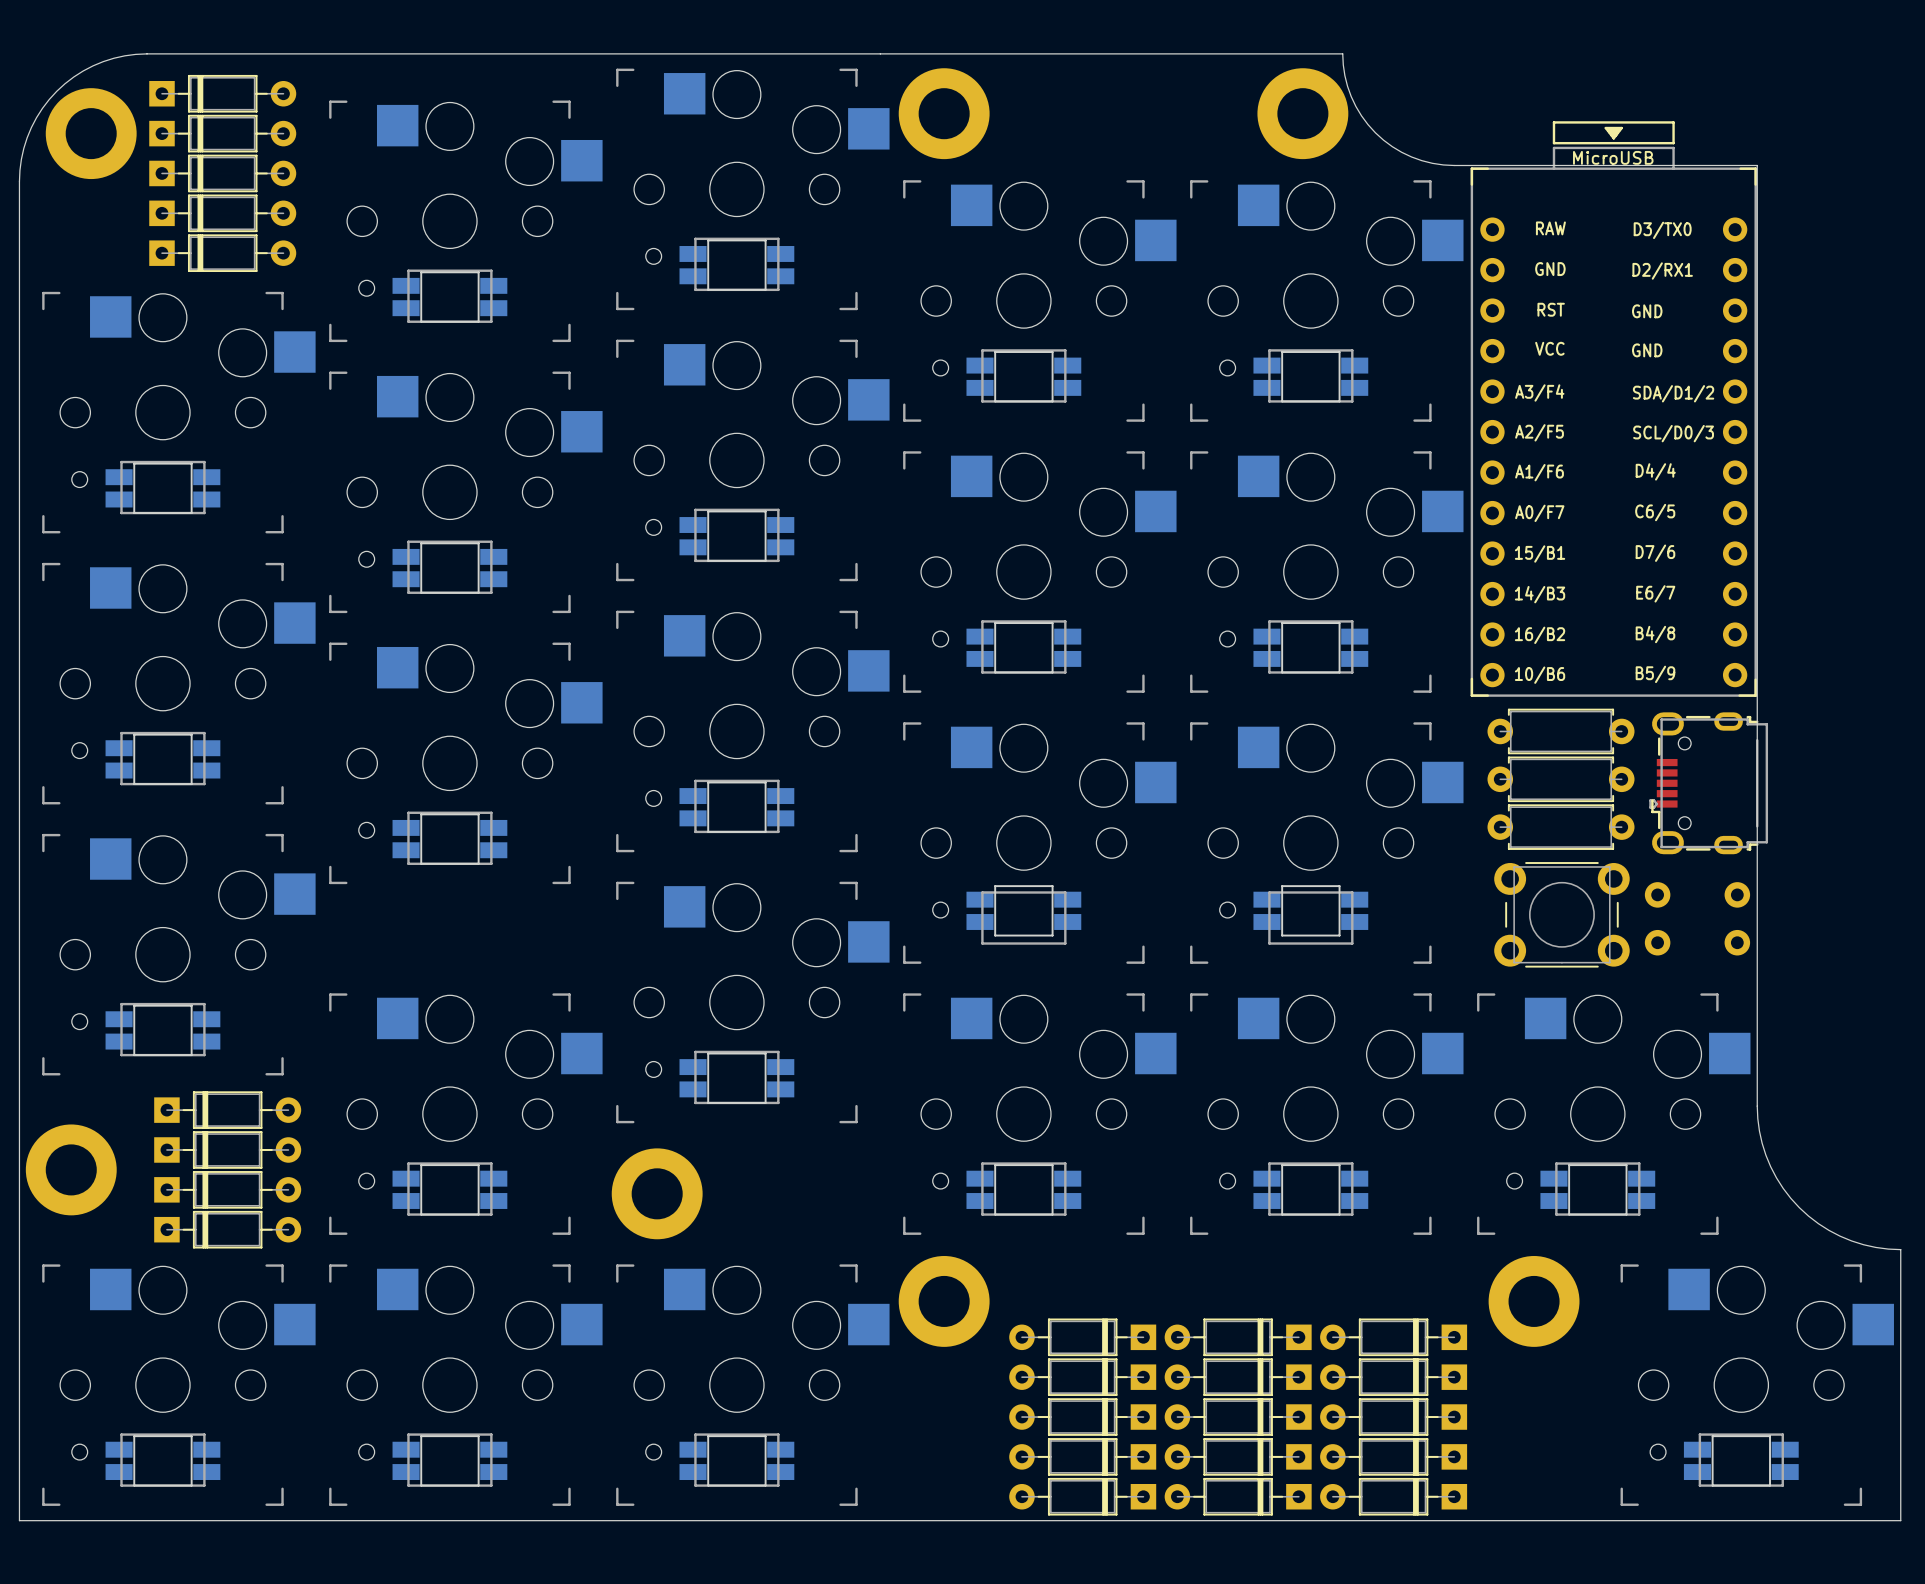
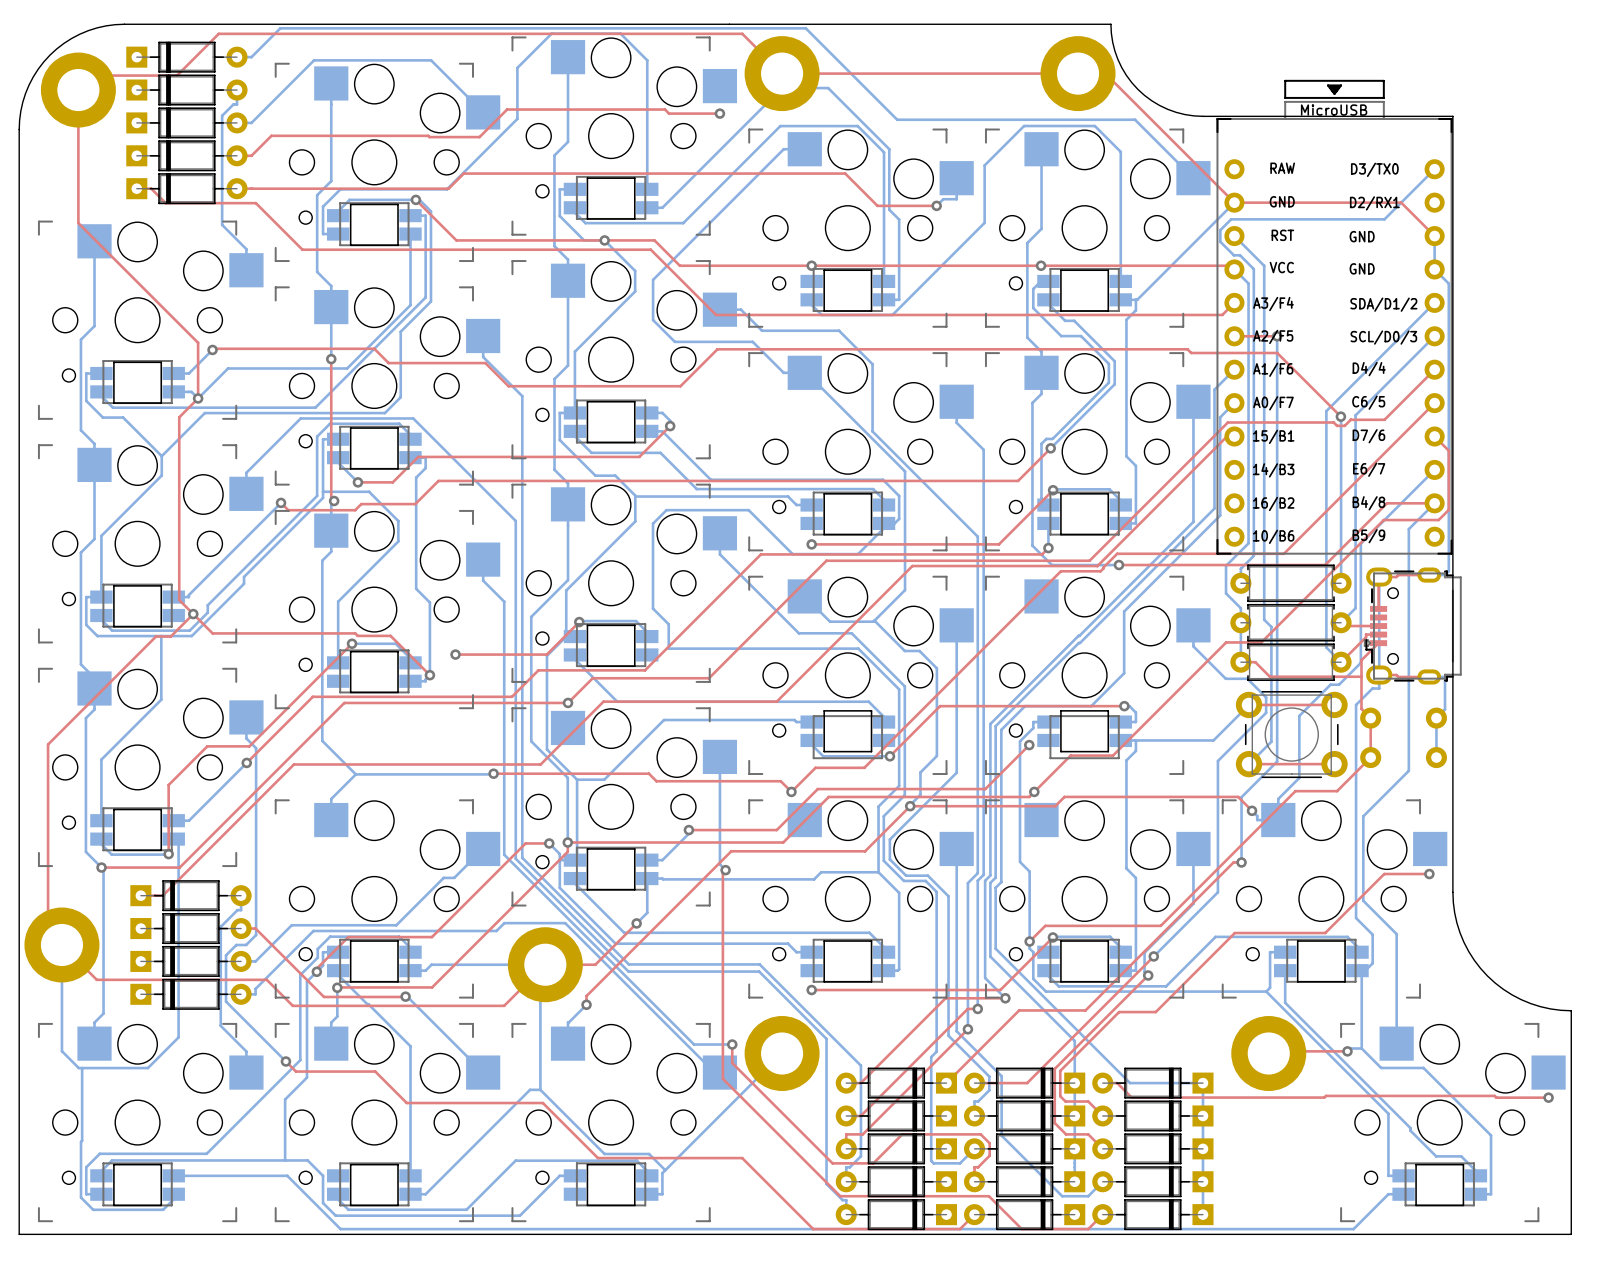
bottom track: none -> (237, 57) (251, 57) (280, 28) (805, 28) (897, 119) (1135, 119) (1193, 178)
bottom track: none -> (568, 57) (568, 141) (554, 155) (554, 246) (568, 259) (568, 365) (554, 379) (554, 469) (568, 483) (568, 580) (531, 616) (531, 741) (567, 777) (567, 842)
bottom track: none -> (331, 83) (331, 181) (317, 195) (317, 271) (331, 286) (331, 359)
bottom track: none -> (782, 88) (828, 88) (889, 149) (889, 209) (899, 219) (899, 299) (884, 299)
bottom track: none -> (782, 88) (662, 207) (647, 207)
bottom track: none -> (237, 90) (237, 104) (233, 104) (222, 115) (222, 224) (246, 249) (246, 270)
bottom track: none -> (483, 112) (431, 60) (314, 60) (251, 122) (237, 122)
top track: none -> (719, 113) (669, 113) (664, 109) (507, 109) (479, 137) (271, 135) (251, 155) (237, 155)
via: none -> (719, 113)
bottom track: none -> (804, 149) (783, 149) (653, 279) (653, 320) (674, 341) (752, 341) (783, 372) (806, 372) (905, 471) (905, 590) (873, 621) (830, 621) (804, 596)
bottom track: none -> (1041, 149) (1041, 228) (1027, 243) (1027, 337) (1041, 351) (1041, 393) (1032, 402) (1032, 545) (1051, 565) (1118, 565)
bottom track: none -> (1434, 169) (1384, 219) (1231, 219) (1220, 230) (1220, 241) (1233, 255) (1240, 255) (1253, 269) (1253, 555) (1240, 568) (1240, 583)
bottom track: none -> (956, 178) (956, 199) (943, 199) (936, 205)
top track: none -> (136, 188) (151, 188) (165, 203) (255, 203) (302, 249) (650, 249) (716, 314) (1222, 314) (1234, 302)
top track: none -> (237, 188) (448, 188) (463, 173) (845, 173) (877, 205) (936, 205)
bottom track: none -> (574, 189) (559, 189) (559, 216) (584, 240) (604, 240) (635, 270) (635, 291) (574, 351) (574, 412) (559, 412) (559, 440) (595, 475) (615, 475) (635, 495) (635, 521) (566, 590) (566, 636)
bottom track: none -> (647, 189) (647, 60) (620, 33) (551, 33) (517, 67) (517, 118) (446, 189) (340, 189) (323, 206) (323, 234) (338, 234)
top track: none -> (415, 199) (456, 240) (654, 240) (679, 265) (1230, 265) (1234, 269)
via: none -> (415, 199)
bottom track: none -> (1234, 202) (1137, 299) (1120, 299)
via: none -> (936, 205)
bottom track: none -> (574, 207) (574, 212) (585, 223) (683, 223) (780, 126) (857, 126) (884, 152) (884, 281)
bottom track: none -> (338, 215) (338, 211) (349, 199) (419, 199) (430, 211) (430, 301) (400, 331) (400, 397) (384, 413) (204, 413) (161, 456)
bottom track: none -> (410, 215) (425, 215) (425, 297) (315, 407) (112, 407) (101, 396) (101, 391)
bottom track: none -> (410, 234) (410, 305) (347, 368) (228, 368) (198, 398) (191, 391) (173, 391)
bottom track: none -> (1234, 236) (1264, 265) (1264, 619) (1271, 626) (1271, 741) (1249, 764)
top track: none -> (1434, 236) (1401, 202) (1234, 202) (1105, 73) (782, 73) (742, 33) (218, 33) (177, 75) (92, 75) (78, 90) (78, 223) (198, 342) (198, 398) (179, 417) (179, 600) (212, 633) (355, 633) (357, 635) (390, 635) (429, 675)
bottom track: none -> (1434, 236) (1434, 269) (1448, 283) (1448, 571) (1445, 575) (1429, 575)
via: none -> (604, 240)
bottom track: none -> (94, 241) (94, 326) (80, 339) (80, 430) (94, 443) (94, 539) (80, 552) (80, 664) (94, 677) (94, 709) (85, 718) (85, 851) (103, 869) (103, 1013) (94, 1022) (94, 1043)
via: none -> (811, 265)
via: none -> (1041, 265)
bottom track: none -> (1234, 269) (1248, 283) (1248, 543) (1226, 565) (1226, 593) (1240, 608) (1240, 662)
bottom track: none -> (1048, 281) (1040, 281) (1033, 288) (1033, 308) (1061, 336) (1081, 336) (1108, 363) (1108, 382) (1052, 438) (1046, 438) (1041, 443) (1041, 498) (1048, 505)
bottom track: none -> (1120, 281) (1120, 151) (1094, 126) (1024, 126) (984, 165) (984, 222) (892, 315) (821, 315) (811, 304) (811, 299)
bottom track: none -> (1048, 299) (1048, 304) (1065, 320) (1074, 320) (1114, 361) (1114, 384) (1050, 448)
bottom track: none -> (1135, 299) (1135, 310) (1126, 319) (1126, 456) (1135, 465) (1135, 523) (1120, 523)
bottom track: none -> (1434, 302) (1326, 411) (1326, 647) (1341, 662)
bottom track: none -> (719, 309) (740, 309) (762, 330) (839, 330) (872, 364) (872, 431) (977, 536) (977, 873) (967, 883) (967, 1029)
bottom track: none -> (483, 336) (483, 357) (522, 396) (522, 857) (628, 964) (759, 964) (860, 1065) (860, 1156) (849, 1167) (846, 1167) (846, 1181)
top track: none -> (1234, 336) (1277, 336)
bottom track: none -> (1277, 336) (1277, 761) (1241, 797) (1241, 862)
via: none -> (1277, 336)
bottom track: none -> (1434, 336) (1355, 415) (1355, 608) (1341, 622)
top track: none -> (212, 349) (374, 348) (388, 363) (485, 363) (508, 386) (680, 386) (717, 349) (1187, 349) (1191, 352) (1277, 352) (1340, 416)
bottom track: none -> (212, 349) (188, 373) (173, 373)
via: none -> (212, 349)
top track: none -> (331, 359) (331, 498) (334, 501)
via: none -> (331, 359)
bottom track: none -> (1234, 369) (1214, 389) (1214, 508) (995, 726) (995, 877) (990, 882) (990, 956) (1074, 1040) (1074, 1181)
top track: none -> (1434, 369) (1384, 419) (1350, 419) (1344, 425) (1337, 425) (1333, 422) (1227, 422) (1089, 560) (826, 560) (708, 678) (592, 678) (568, 702) (344, 702) (179, 867) (101, 867)
bottom track: none -> (101, 373) (86, 373) (86, 400) (102, 417) (123, 417) (161, 456)
via: none -> (198, 398)
bottom track: none -> (956, 401) (956, 422) (983, 449) (983, 874) (977, 880) (977, 1008)
bottom track: none -> (1193, 401) (1193, 521) (990, 724) (990, 875) (985, 880) (985, 978) (1005, 998)
bottom track: none -> (1234, 403) (1220, 417) (1220, 515) (1124, 611) (1124, 673) (1091, 706) (1025, 706) (1001, 729) (1001, 882) (995, 887) (995, 948) (1130, 1083) (1202, 1083) (1202, 1214)
top track: none -> (1434, 403) (1283, 553) (1117, 553) (1100, 571) (1060, 571) (864, 767) (815, 767) (791, 791) (780, 781) (656, 781) (648, 773) (493, 773)
bottom track: none -> (647, 412) (662, 412) (670, 420) (670, 426)
bottom track: none -> (1340, 416) (1341, 583)
via: none -> (1340, 416)
top track: none -> (670, 426) (639, 456) (418, 456) (392, 482) (357, 482)
via: none -> (670, 426)
bottom track: none -> (574, 431) (574, 436) (591, 452) (660, 452) (696, 489) (873, 489) (884, 499) (884, 505)
bottom track: none -> (647, 431) (662, 431) (710, 479) (882, 479) (899, 495) (899, 518) (894, 523) (884, 523) (884, 528) (858, 554) (792, 554) (748, 510) (666, 510) (653, 523) (653, 608) (668, 624) (668, 648) (858, 648) (899, 689) (899, 785) (878, 806) (878, 872)
top track: none -> (1234, 436) (1227, 436) (1097, 566) (912, 566) (776, 701) (603, 701) (540, 764) (293, 764) (162, 895) (140, 895)
top track: none -> (1434, 436) (1448, 450) (1448, 509) (1438, 520) (1383, 520) (1261, 642) (1226, 642) (1113, 755) (1070, 755) (1029, 796) (828, 796) (783, 842) (567, 842) (567, 851) (432, 987) (337, 987)
bottom track: none -> (338, 439) (323, 439) (323, 497) (244, 576) (244, 583) (191, 636) (97, 636) (86, 624) (86, 597) (101, 597) (101, 535) (161, 475) (161, 456)
bottom track: none -> (410, 439) (410, 434) (399, 423) (330, 423) (317, 436) (317, 495) (207, 605) (207, 612) (189, 630) (112, 630) (101, 619) (101, 615)
top track: none -> (1050, 448) (1018, 480) (438, 480) (415, 504) (361, 504) (355, 510) (288, 510) (281, 502)
via: none -> (1050, 448)
bottom track: none -> (338, 457) (338, 462) (357, 482)
bottom track: none -> (410, 457) (425, 457) (425, 468) (416, 477) (416, 588) (429, 602) (429, 675) (425, 681) (410, 681)
bottom track: none -> (1434, 469) (1360, 543) (1360, 662) (1339, 684) (1330, 684) (1299, 715) (1299, 777) (1278, 798) (1278, 820) (1257, 820) (1257, 816) (1252, 810)
via: none -> (357, 482)
top track: none -> (1053, 490) (998, 544) (811, 544)
bottom track: none -> (1053, 490) (1109, 489) (1120, 500) (1120, 505)
via: none -> (1053, 490)
bottom track: none -> (323, 491) (369, 491) (398, 521) (398, 541) (338, 601) (338, 662)
bottom track: none -> (246, 493) (246, 472) (300, 418) (413, 418) (515, 520) (515, 858) (628, 971) (759, 971) (826, 1038) (826, 1184) (842, 1200) (846, 1200) (846, 1214)
bottom track: none -> (635, 496) (788, 496) (796, 505) (811, 505)
bottom track: none -> (334, 501) (331, 503) (331, 551) (322, 560) (322, 740) (355, 774)
via: none -> (334, 501)
bottom track: none -> (281, 502) (188, 597) (173, 597)
via: none -> (281, 502)
top track: none -> (1434, 503) (1386, 503) (1325, 565) (1118, 565)
bottom track: none -> (1434, 503) (1408, 529) (1408, 770) (1363, 816) (1363, 900) (1396, 934) (1396, 1043)
bottom track: none -> (1048, 523) (1048, 548)
bottom track: none -> (719, 533) (719, 554) (798, 633) (851, 633) (904, 686) (904, 795) (883, 816) (883, 860) (903, 880) (925, 880) (936, 891) (936, 1051) (931, 1057) (931, 1160) (933, 1163) (960, 1163) (974, 1148)
via: none -> (811, 544)
top track: none -> (1048, 548) (1042, 554) (760, 554) (645, 670) (538, 670) (511, 696) (312, 696) (246, 762)
via: none -> (1048, 548)
bottom track: none -> (483, 559) (483, 580) (504, 601) (504, 854) (694, 1044) (732, 1044)
via: none -> (1118, 565)
top track: none -> (1429, 575) (1379, 577)
bottom track: none -> (1379, 577) (1379, 688) (1372, 688) (1356, 704) (1356, 918) (1372, 934) (1372, 963) (1365, 970) (1357, 970)
top track: none -> (1382, 577) (1378, 581) (1378, 608)
top track: none -> (193, 614) (170, 636) (156, 636) (48, 744) (48, 931) (96, 979) (266, 979) (292, 1005) (504, 1005) (545, 964) (595, 964) (636, 923)
via: none -> (193, 614)
bottom track: none -> (874, 620) (904, 651) (919, 651) (936, 668) (936, 756) (920, 772) (920, 794) (910, 806)
top track: none -> (579, 622) (546, 654) (455, 654)
bottom track: none -> (579, 622) (636, 621) (647, 632) (647, 636)
via: none -> (579, 622)
top track: none -> (1341, 622) (1344, 626) (1378, 626)
bottom track: none -> (956, 625) (956, 772) (889, 839) (889, 859) (906, 875) (927, 875) (948, 896) (948, 1035) (989, 1076) (989, 1090) (978, 1101) (974, 1101) (974, 1115)
bottom track: none -> (1193, 625) (1193, 646) (1225, 678) (1247, 678) (1266, 697) (1266, 712) (1217, 761) (1217, 892) (1153, 956)
top track: none -> (1378, 634) (1366, 634) (1366, 637) (1341, 662)
bottom track: none -> (161, 636) (161, 699) (101, 759) (101, 820)
bottom track: none -> (566, 636) (546, 655) (546, 749) (577, 779)
top track: none -> (352, 643) (249, 746) (207, 746) (168, 785) (168, 854)
bottom track: none -> (352, 643) (395, 643) (410, 658) (410, 662)
via: none -> (352, 643)
top track: none -> (1378, 643) (1361, 660) (1361, 708) (1370, 718) (1370, 757) (1337, 791) (1295, 791) (1160, 925) (1045, 925) (1029, 941)
via: none -> (455, 654)
bottom track: none -> (574, 654) (574, 659) (617, 701) (868, 701) (884, 716) (884, 722)
top track: none -> (1240, 662) (1255, 662) (1269, 676) (1361, 676)
via: none -> (429, 675)
top track: none -> (1379, 675) (1429, 676)
bottom track: none -> (1429, 676) (1445, 676) (1445, 709) (1436, 718) (1436, 757)
via: none -> (568, 702)
top track: none -> (1249, 704) (1334, 704)
bottom track: none -> (1249, 704) (1213, 740) (1120, 740)
top track: none -> (1124, 706) (940, 706) (889, 756)
bottom track: none -> (1124, 706) (1129, 706) (1135, 712) (1135, 722) (1120, 722)
via: none -> (1124, 706)
bottom track: none -> (246, 717) (246, 738) (256, 748) (256, 935) (246, 944) (236, 944) (226, 955) (226, 1001) (285, 1061)
bottom track: none -> (811, 722) (796, 722) (794, 720) (664, 720) (604, 779) (577, 779)
bottom track: none -> (1048, 722) (1033, 722) (1033, 728) (1020, 741) (1020, 861) (1029, 871) (1029, 948) (1033, 952) (1033, 978) (1046, 991) (1266, 991)
bottom track: none -> (811, 740) (811, 744) (823, 756) (889, 756)
bottom track: none -> (1135, 740) (1135, 750) (1126, 760) (1126, 868) (1135, 877) (1135, 970) (1120, 970)
top track: none -> (1029, 745) (985, 789) (817, 789) (776, 830) (688, 830)
via: none -> (1029, 745)
bottom track: none -> (719, 756) (719, 864) (725, 870)
via: none -> (889, 756)
bottom track: none -> (246, 762) (188, 820) (173, 820)
via: none -> (246, 762)
top track: none -> (1249, 764) (1334, 764)
bottom track: none -> (493, 773) (355, 774)
via: none -> (493, 773)
bottom track: none -> (355, 774) (331, 798) (331, 820)
bottom track: none -> (577, 779) (577, 857) (574, 860) (559, 860)
via: none -> (791, 791)
via: none -> (1034, 791)
via: none -> (910, 806)
top track: none -> (1252, 810) (1238, 796) (1064, 796) (1055, 806) (910, 806) (865, 851) (731, 851) (586, 996) (586, 1004)
via: none -> (1252, 810)
bottom track: none -> (688, 830) (688, 833) (662, 860) (647, 860)
via: none -> (688, 830)
bottom track: none -> (101, 839) (101, 844) (111, 854) (168, 854)
bottom track: none -> (173, 839) (178, 840) (178, 1037) (147, 1068) (78, 1068) (61, 1051) (61, 944)
via: none -> (567, 842)
top track: none -> (549, 843) (525, 843) (431, 937) (348, 937) (316, 968) (316, 971)
bottom track: none -> (549, 843) (559, 853) (559, 887) (615, 943) (788, 943) (796, 952) (811, 952)
via: none -> (549, 843)
bottom track: none -> (483, 848) (454, 877) (443, 877) (396, 925) (291, 925) (255, 961) (241, 961)
bottom track: none -> (956, 848) (956, 1031) (1001, 1076) (1001, 1135) (1062, 1196) (1088, 1196) (1102, 1181)
bottom track: none -> (1193, 848) (1193, 903) (1144, 952) (1144, 971) (1148, 975)
via: none -> (168, 854)
top track: none -> (1241, 862) (1233, 862) (1085, 1010) (1019, 1010) (946, 1083)
via: none -> (1241, 862)
via: none -> (101, 867)
top track: none -> (725, 870) (722, 872) (722, 1078) (840, 1196) (988, 1196) (1021, 1229) (1088, 1229) (1102, 1214)
via: none -> (725, 870)
bottom track: none -> (878, 872) (899, 892) (899, 969) (884, 970)
bottom track: none -> (878, 872) (821, 872) (814, 879) (647, 878) (647, 912) (636, 923)
top track: none -> (1429, 874) (1384, 874) (1325, 933) (1234, 933) (1155, 1012) (1119, 1012) (1060, 1070) (1060, 1096) (1065, 1101) (1088, 1101) (1102, 1115)
via: none -> (1429, 874)
bottom track: none -> (574, 878) (574, 883) (624, 932) (869, 932) (884, 947) (884, 952)
bottom track: none -> (241, 895) (241, 910) (237, 910) (220, 926) (220, 1025) (246, 1051) (246, 1072)
via: none -> (636, 923)
top track: none -> (241, 928) (255, 928) (324, 996) (405, 996)
top track: none -> (1052, 937) (1000, 990) (811, 990)
bottom track: none -> (1052, 937) (1110, 936) (1120, 947) (1120, 952)
via: none -> (1052, 937)
via: none -> (1029, 941)
bottom track: none -> (338, 952) (323, 952) (323, 965) (306, 981) (306, 1077) (285, 1099) (285, 1160)
bottom track: none -> (410, 952) (410, 947) (399, 936) (330, 936) (317, 949) (317, 957) (300, 975) (300, 1060) (206, 1153) (99, 1153) (86, 1167) (86, 1194) (101, 1194)
bottom track: none -> (1285, 952) (1270, 952) (1270, 987) (1266, 991)
bottom track: none -> (1357, 952) (1357, 946) (1347, 936) (1215, 936) (1166, 986) (1058, 986) (1048, 975) (1048, 970)
top track: none -> (1153, 956) (1027, 1083) (974, 1083)
via: none -> (1153, 956)
bottom track: none -> (338, 970) (338, 975) (410, 1046) (410, 1175)
bottom track: none -> (410, 970) (425, 970) (431, 964) (545, 964) (540, 969) (540, 1089)
bottom track: none -> (1285, 970) (1285, 1002) (1410, 1128) (1410, 1130) (1436, 1156) (1461, 1156) (1475, 1170) (1475, 1175)
bottom track: none -> (1361, 970) (1361, 1048)
via: none -> (316, 971)
top track: none -> (1148, 975) (1054, 1068) (1054, 1123) (1066, 1134) (1088, 1134) (1102, 1148)
via: none -> (1148, 975)
bottom track: none -> (337, 987) (337, 1016) (331, 1022) (331, 1043)
via: none -> (337, 987)
via: none -> (811, 990)
bottom track: none -> (1266, 991) (1388, 1113) (1388, 1175) (1403, 1175)
bottom track: none -> (241, 994) (255, 994) (255, 988) (313, 930) (496, 930) (504, 923) (565, 923) (714, 1072) (719, 1072)
bottom track: none -> (405, 996) (483, 1072)
via: none -> (405, 996)
top track: none -> (1005, 998) (945, 998) (860, 1083) (846, 1083)
via: none -> (1005, 998)
bottom track: none -> (586, 1004) (568, 1022) (568, 1043)
via: none -> (586, 1004)
top track: none -> (977, 1008) (967, 1008) (860, 1115) (846, 1115)
via: none -> (977, 1008)
top track: none -> (967, 1029) (862, 1134) (846, 1134) (846, 1148)
via: none -> (967, 1029)
top track: none -> (732, 1044) (732, 1063) (832, 1163) (873, 1163) (902, 1134) (980, 1134) (989, 1143) (989, 1155) (978, 1167) (974, 1167) (974, 1181)
via: none -> (732, 1044)
bottom track: none -> (1361, 1048) (1350, 1048) (1347, 1051)
bottom track: none -> (1361, 1048) (1381, 1067) (1423, 1067) (1491, 1135) (1491, 1194) (1475, 1194)
top track: none -> (1347, 1051) (1270, 1051) (1268, 1053)
via: none -> (1347, 1051)
bottom track: none -> (782, 1053) (662, 1173) (662, 1194) (647, 1194)
top track: none -> (285, 1061) (295, 1071) (375, 1071) (406, 1103) (542, 1103) (597, 1158) (742, 1158) (813, 1229) (960, 1229) (974, 1214)
via: none -> (285, 1061)
bottom track: none -> (82, 1068) (81, 1197) (93, 1209) (163, 1209) (173, 1199) (173, 1194)
top track: none -> (1102, 1083) (1117, 1083) (1131, 1097) (1494, 1095) (1496, 1097) (1548, 1097)
bottom track: none -> (540, 1089) (604, 1154) (649, 1154) (665, 1170)
bottom track: none -> (540, 1089) (530, 1089) (425, 1194) (410, 1194)
via: none -> (1548, 1097)
bottom track: none -> (101, 1175) (101, 1171) (112, 1160) (307, 1160) (323, 1175) (323, 1203) (335, 1215) (519, 1215) (559, 1175) (574, 1175)
bottom track: none -> (173, 1175) (287, 1175) (340, 1229) (1353, 1229) (1388, 1194) (1403, 1194)
bottom track: none -> (647, 1175) (647, 1171) (636, 1160) (515, 1160) (466, 1209) (348, 1209) (338, 1199) (338, 1194)

